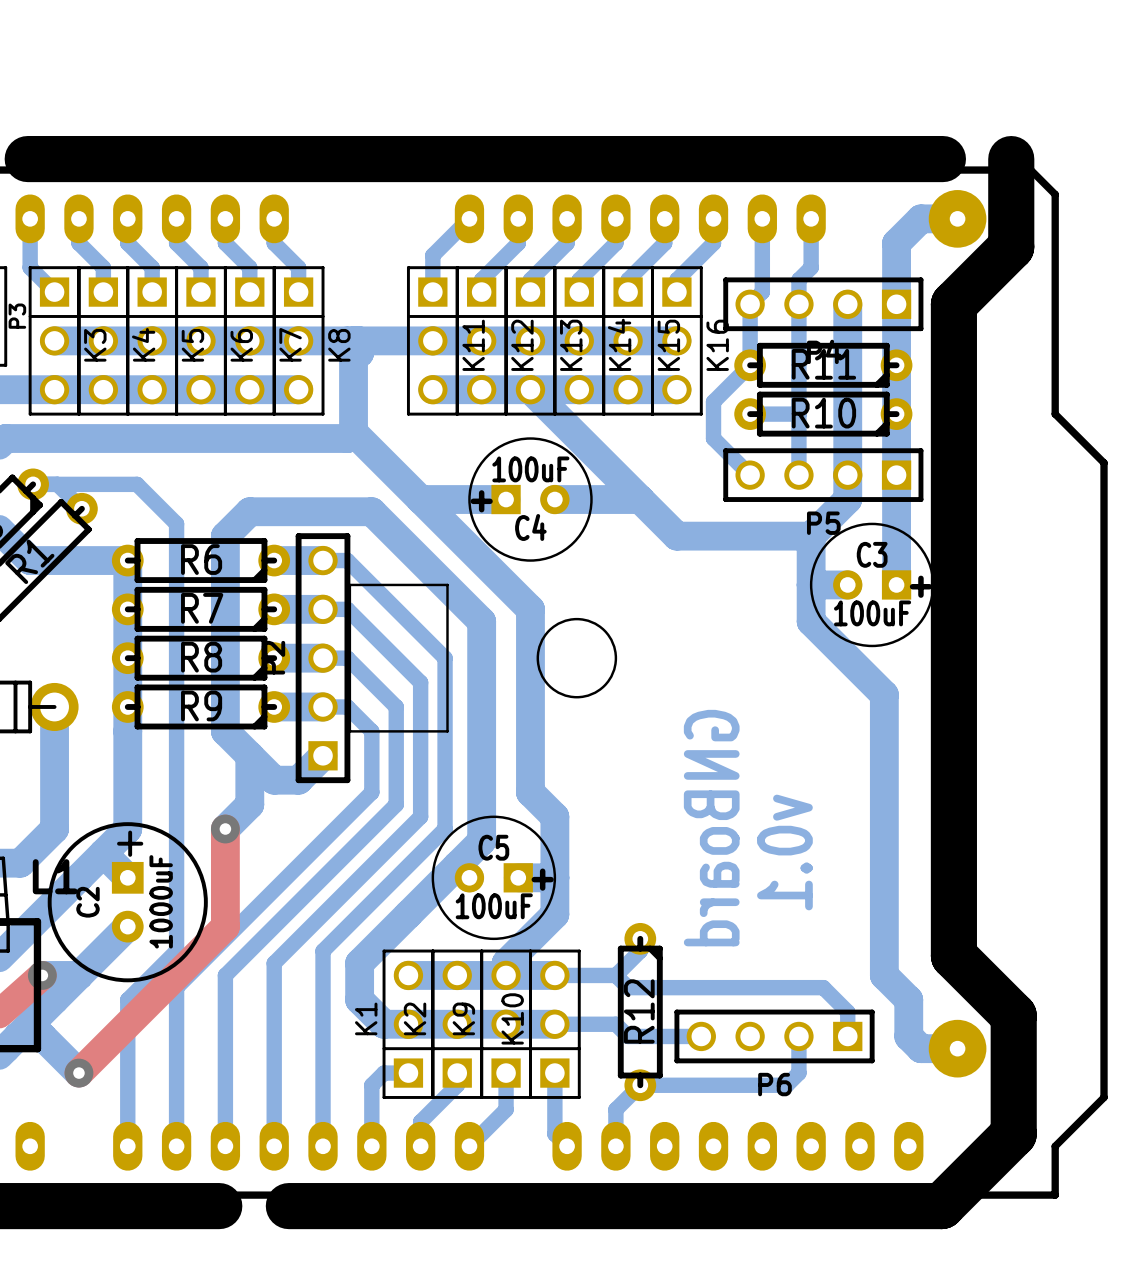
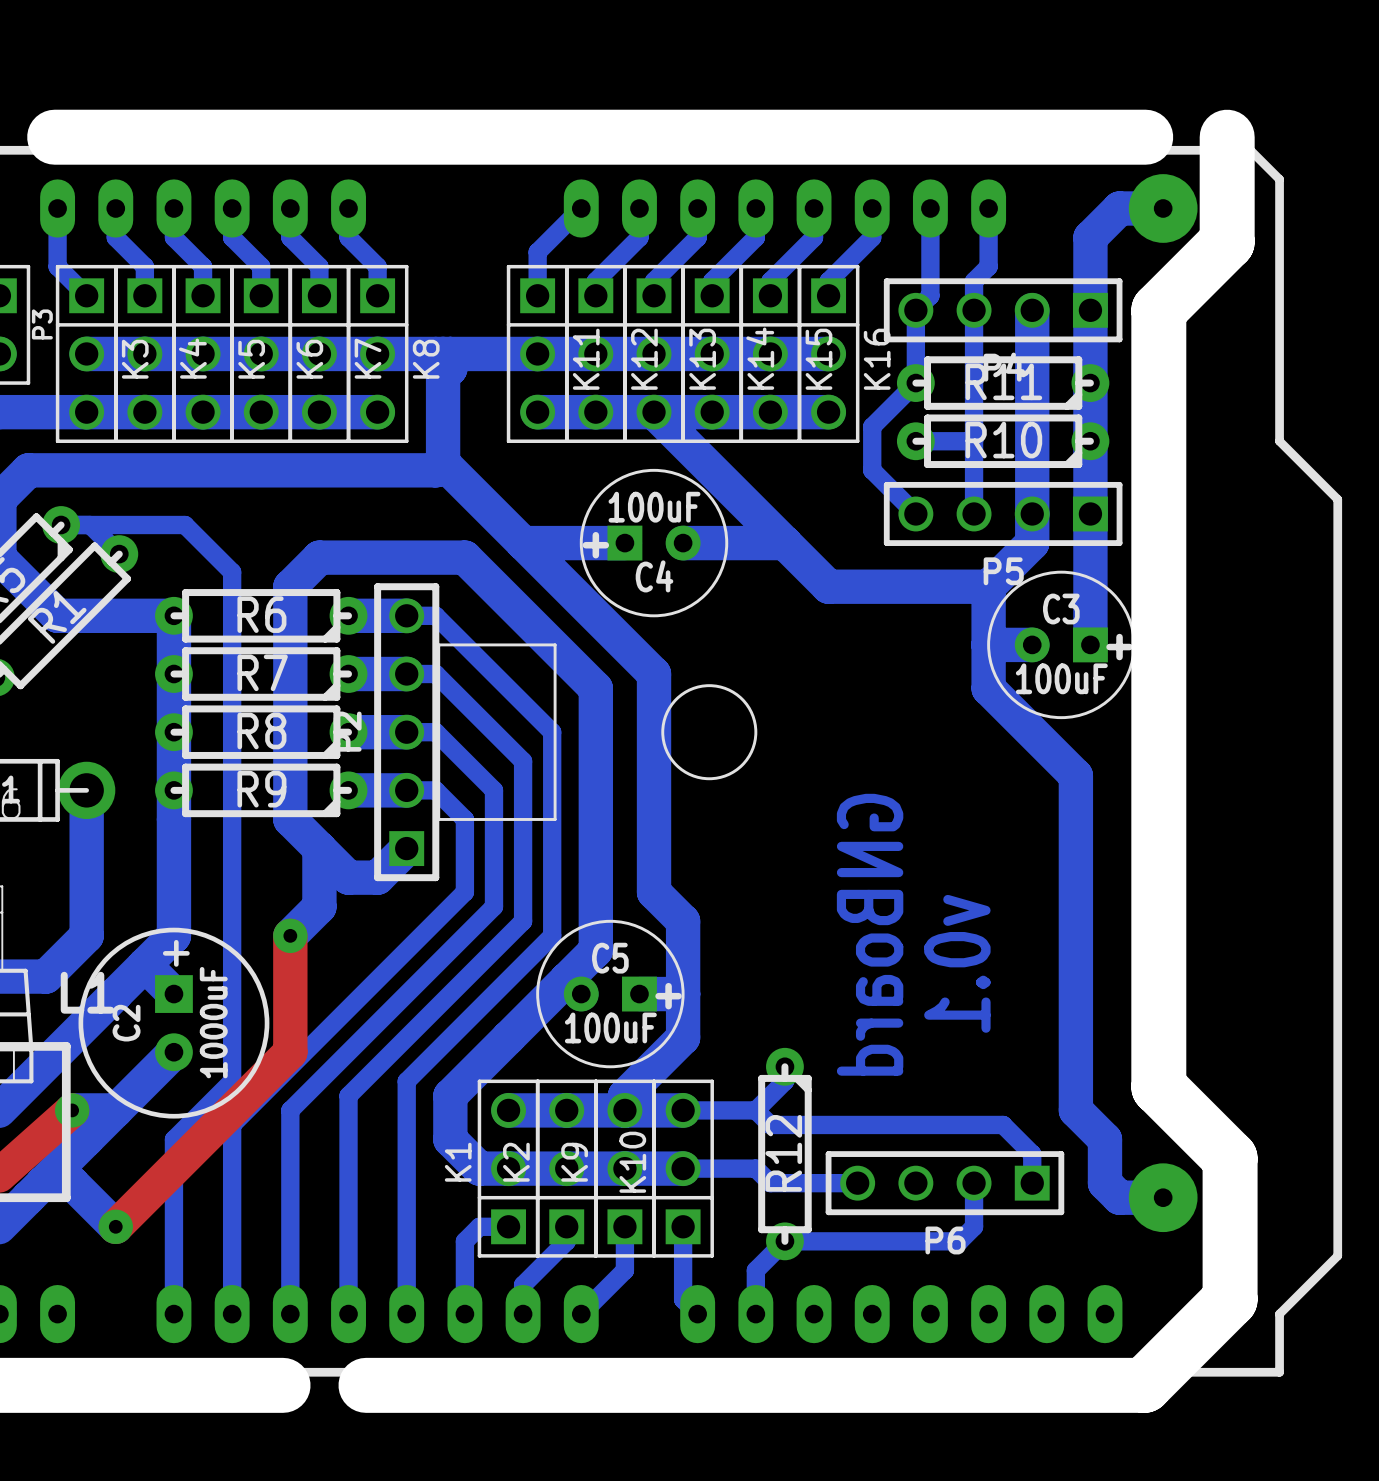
C2 footprint: [47, 822, 208, 983] -> [78, 927, 270, 1119]

